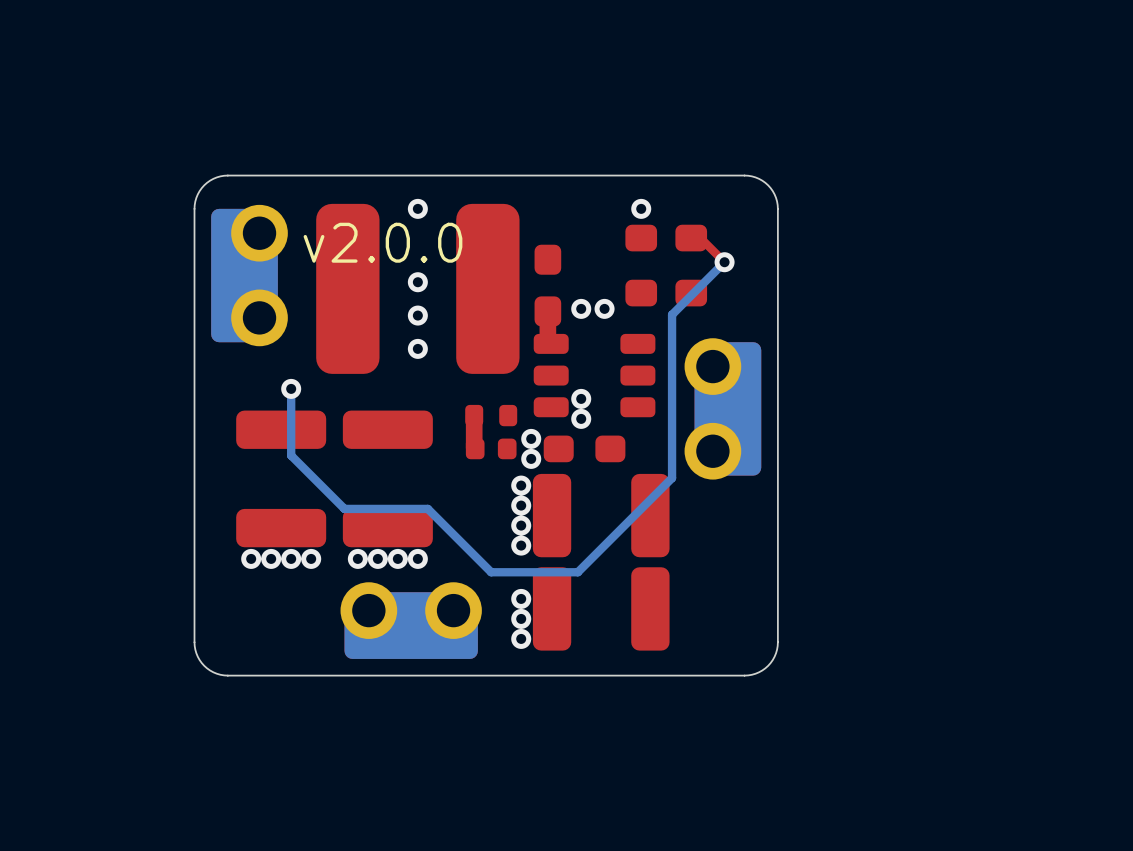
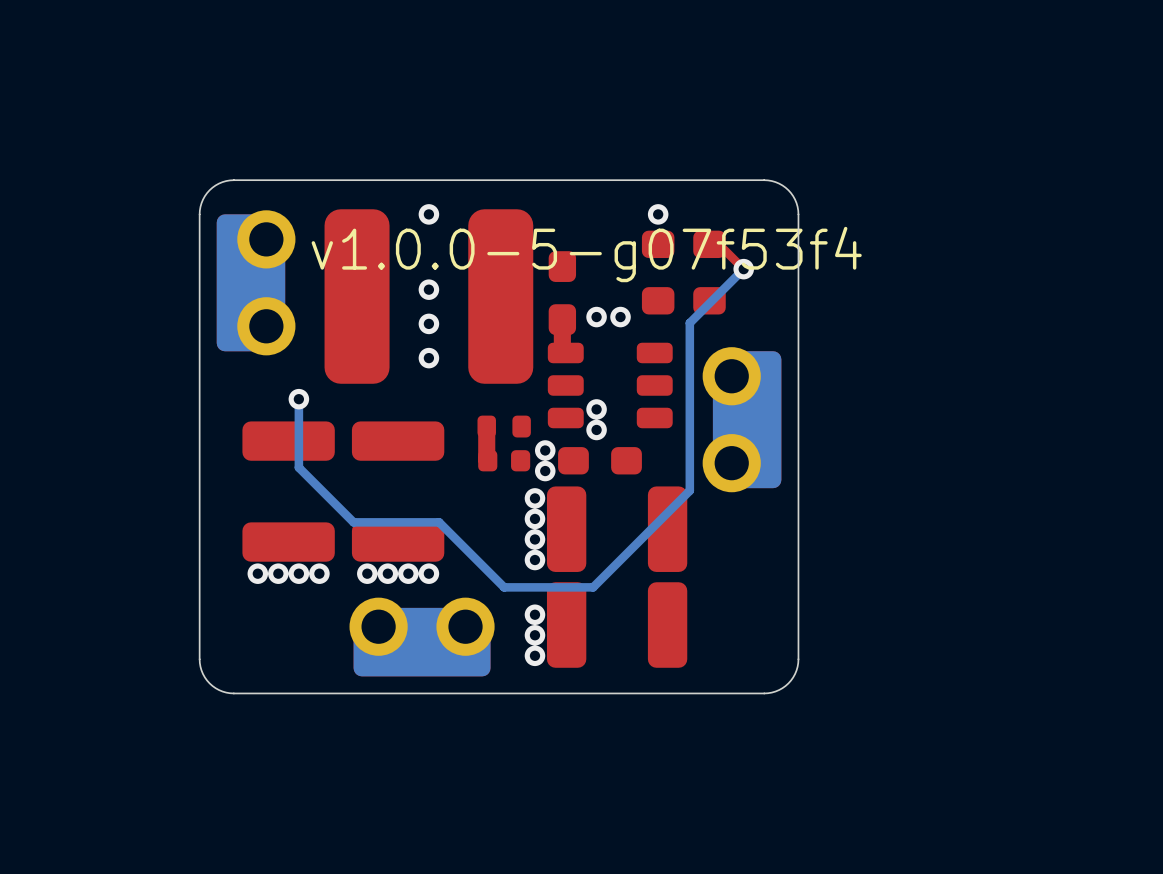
text: v2.0.0 (382, 242) -> v1.0.0-5-g07f53f4 (586, 254)

